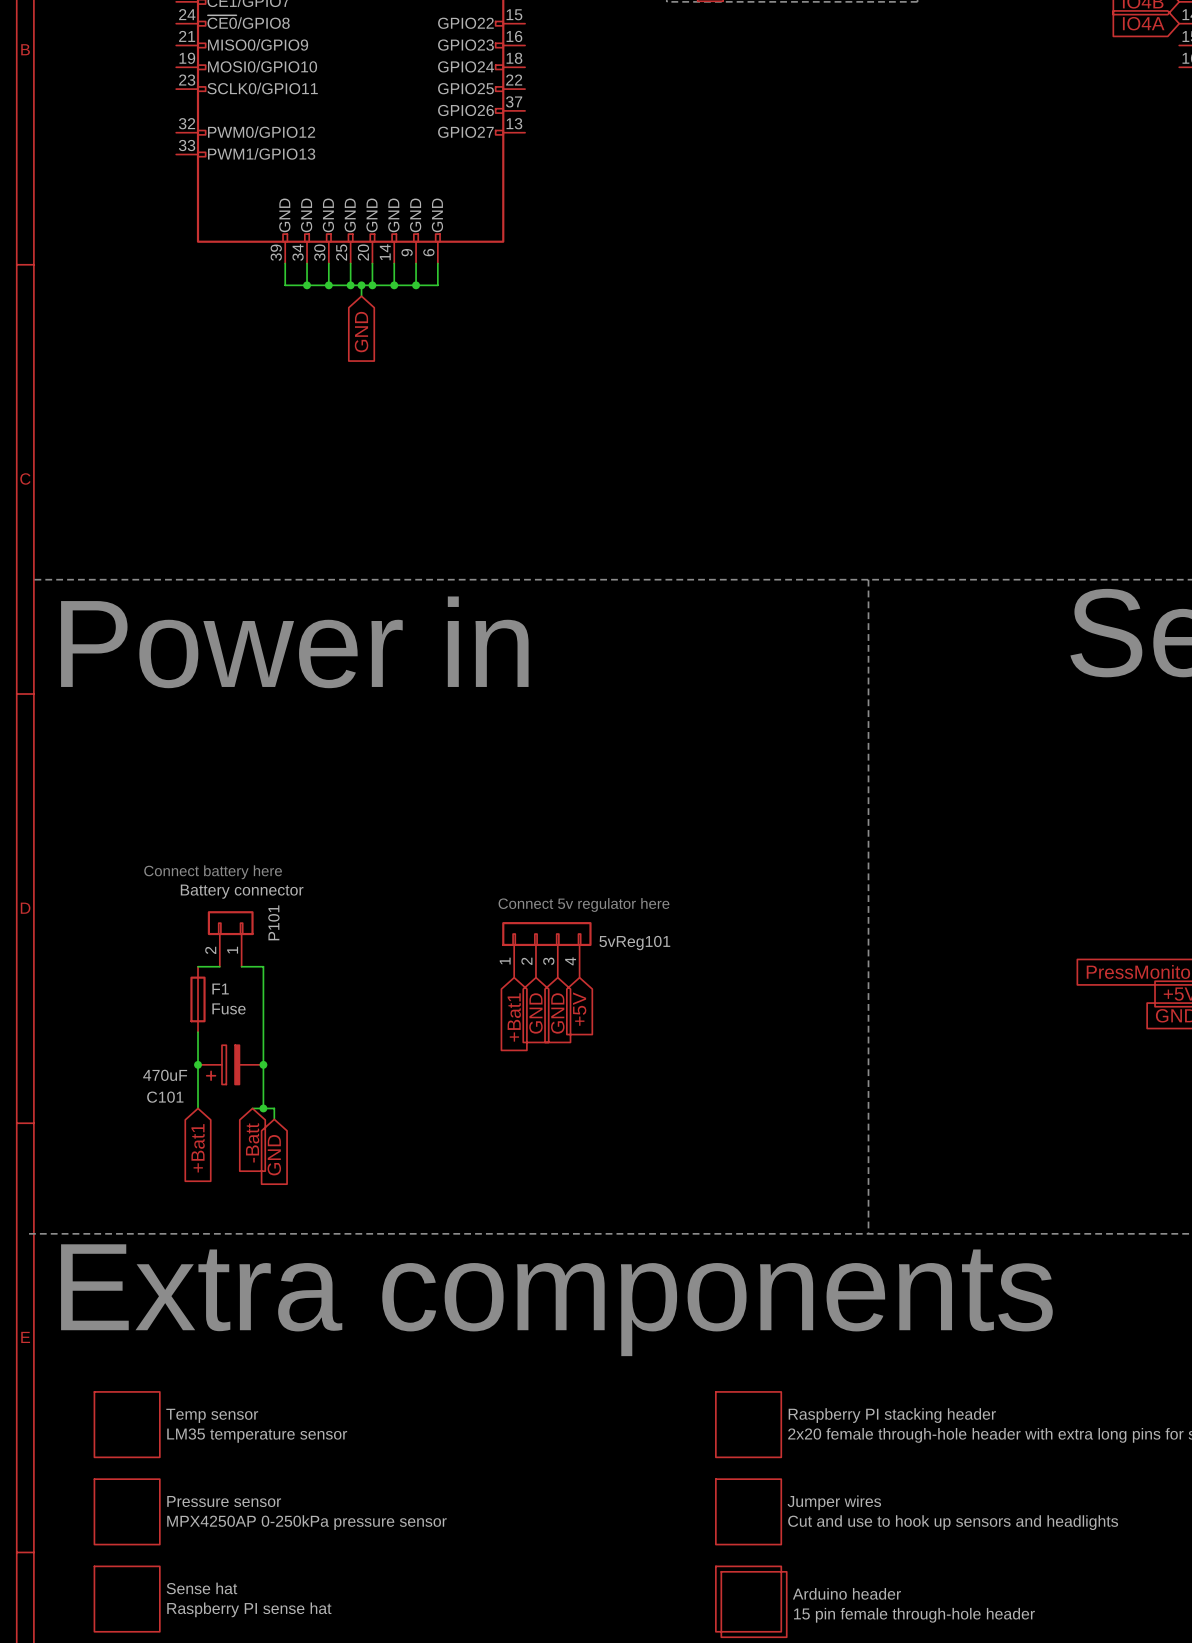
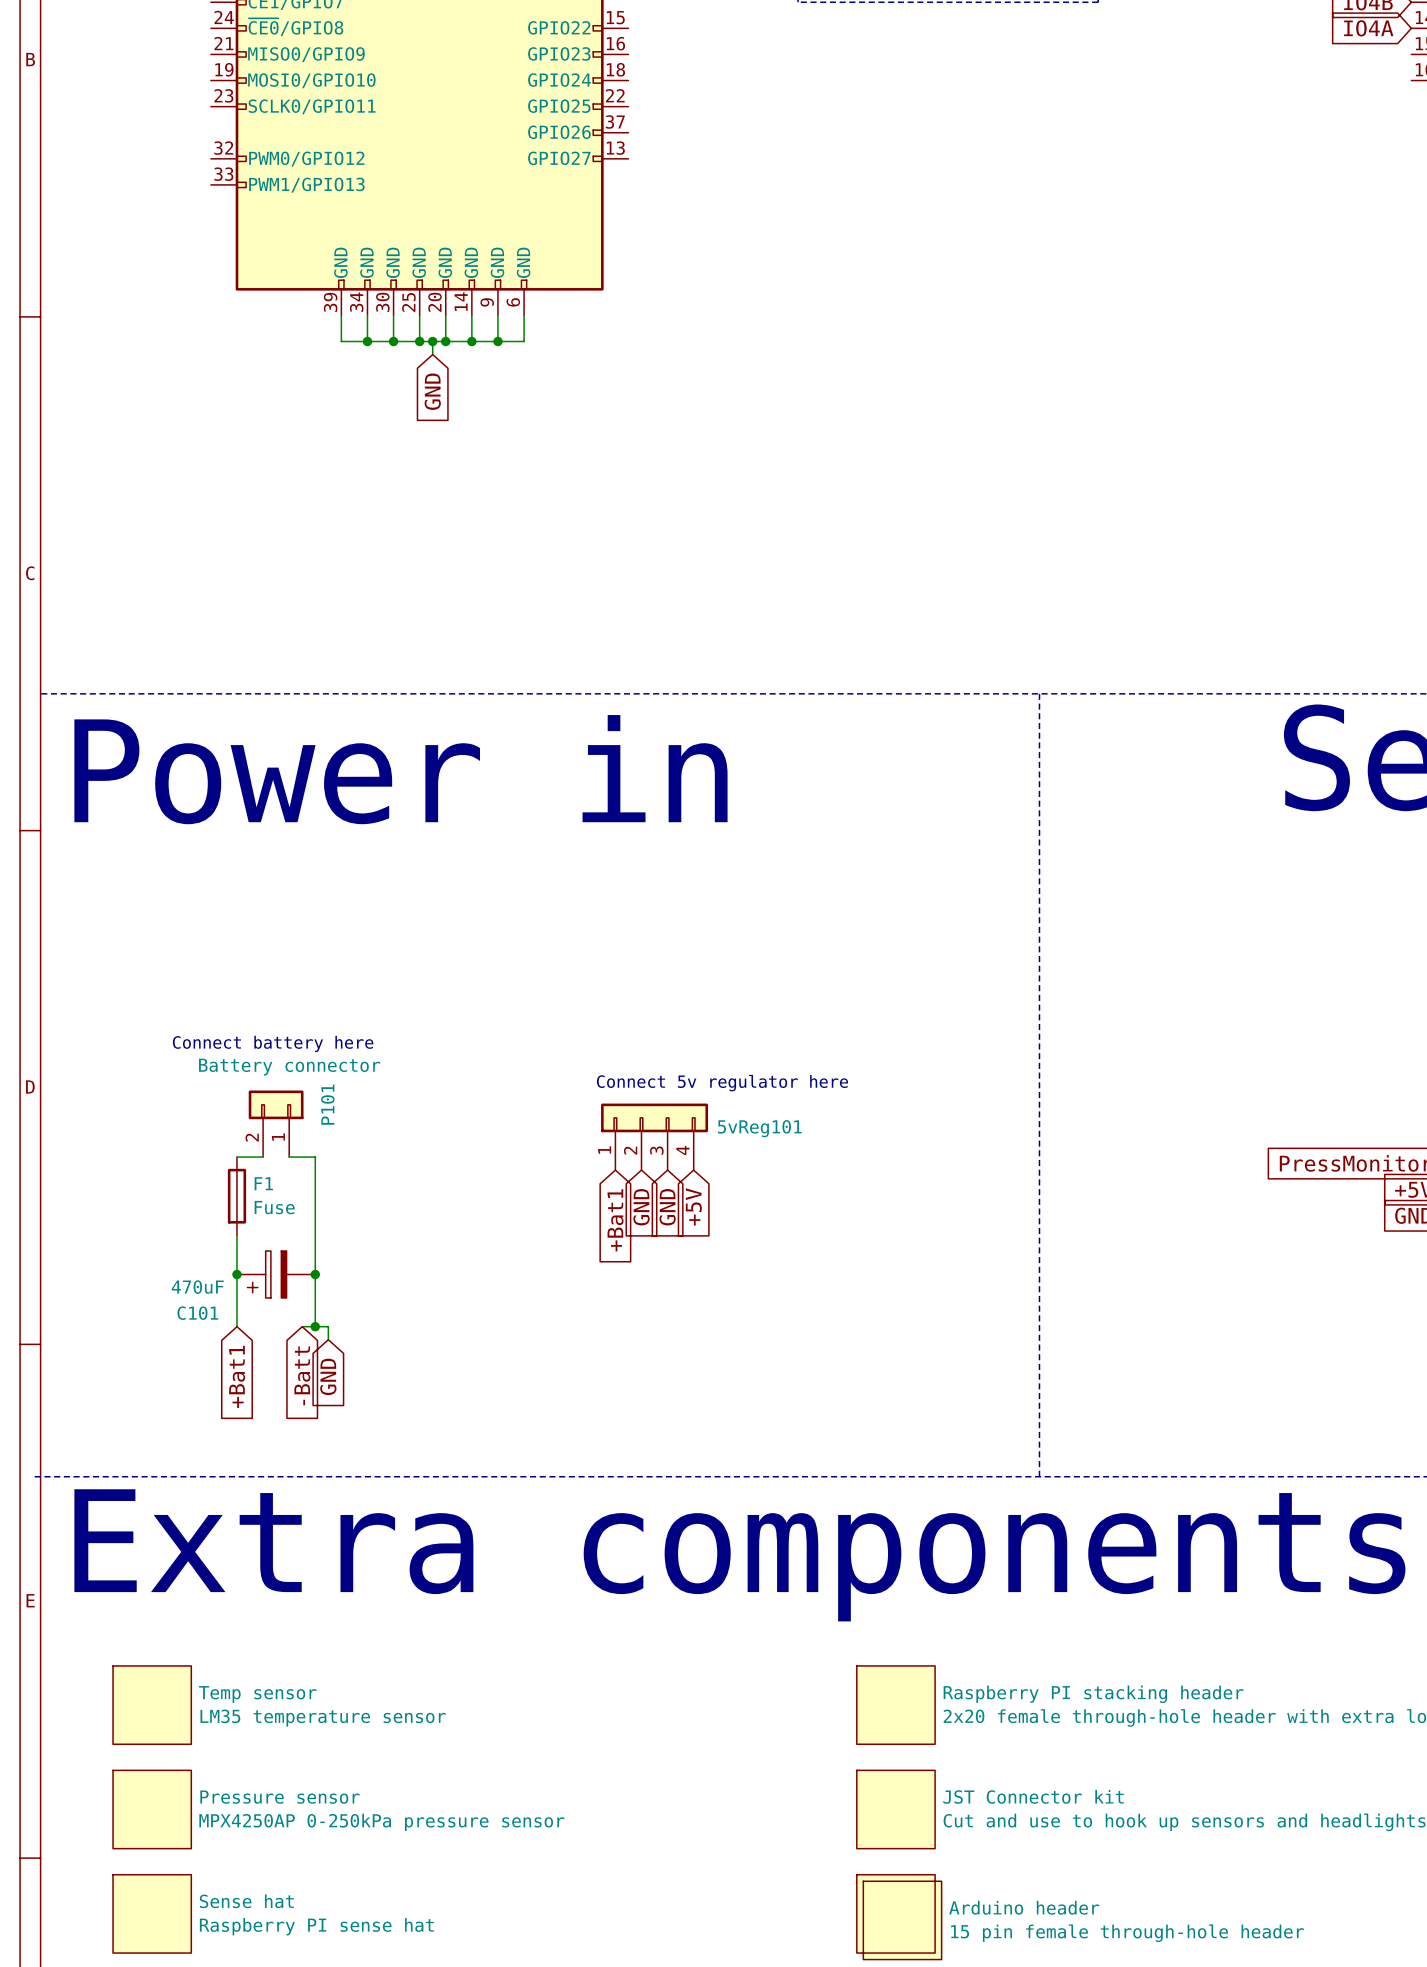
part value: Jumper wires (834, 1502) -> JST Connector kit (1033, 1796)

